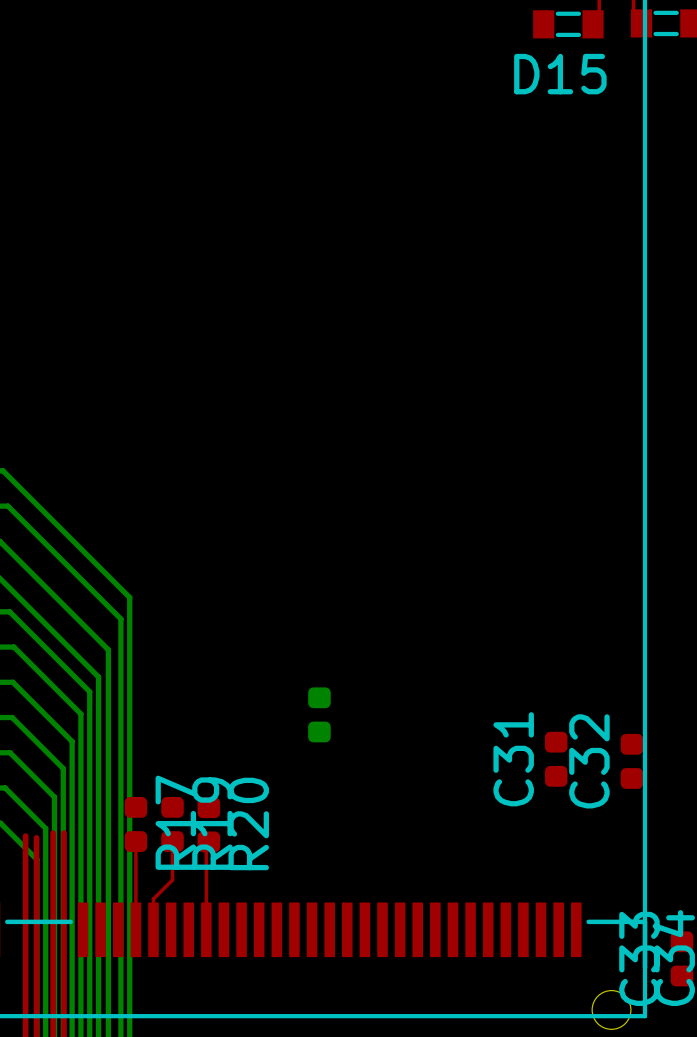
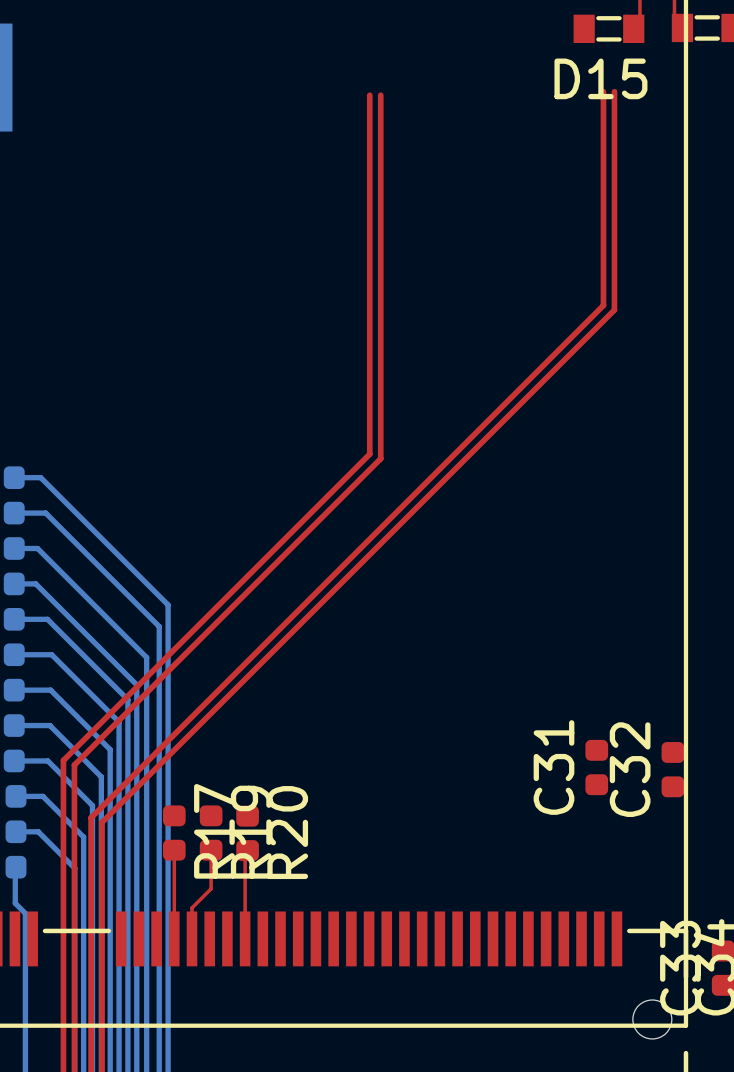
top track: none -> (603, 91) (603, 305) (91, 817) (91, 841)
top track: none -> (614, 91) (614, 309) (102, 822) (102, 841)
top track: none -> (369, 95) (369, 454) (63, 760) (63, 844)
top track: none -> (380, 95) (380, 458) (74, 765) (74, 846)
part: (319, 714) -> none

